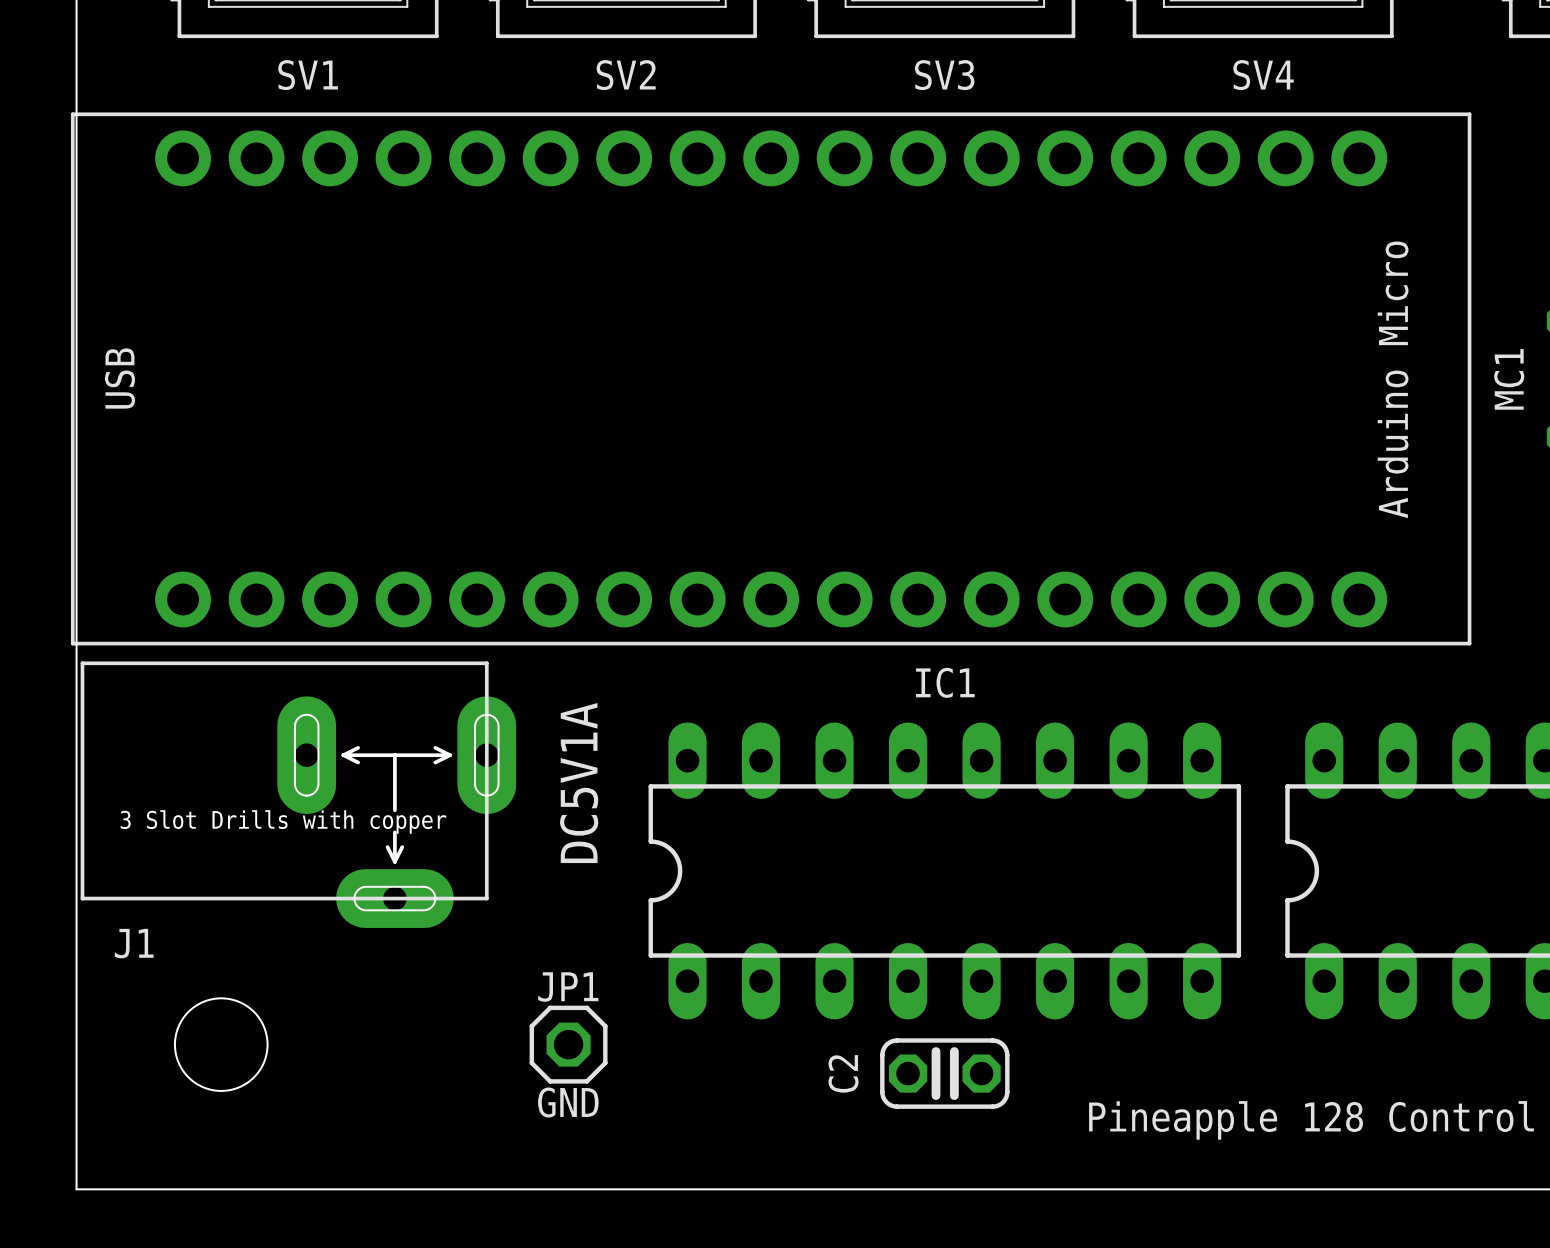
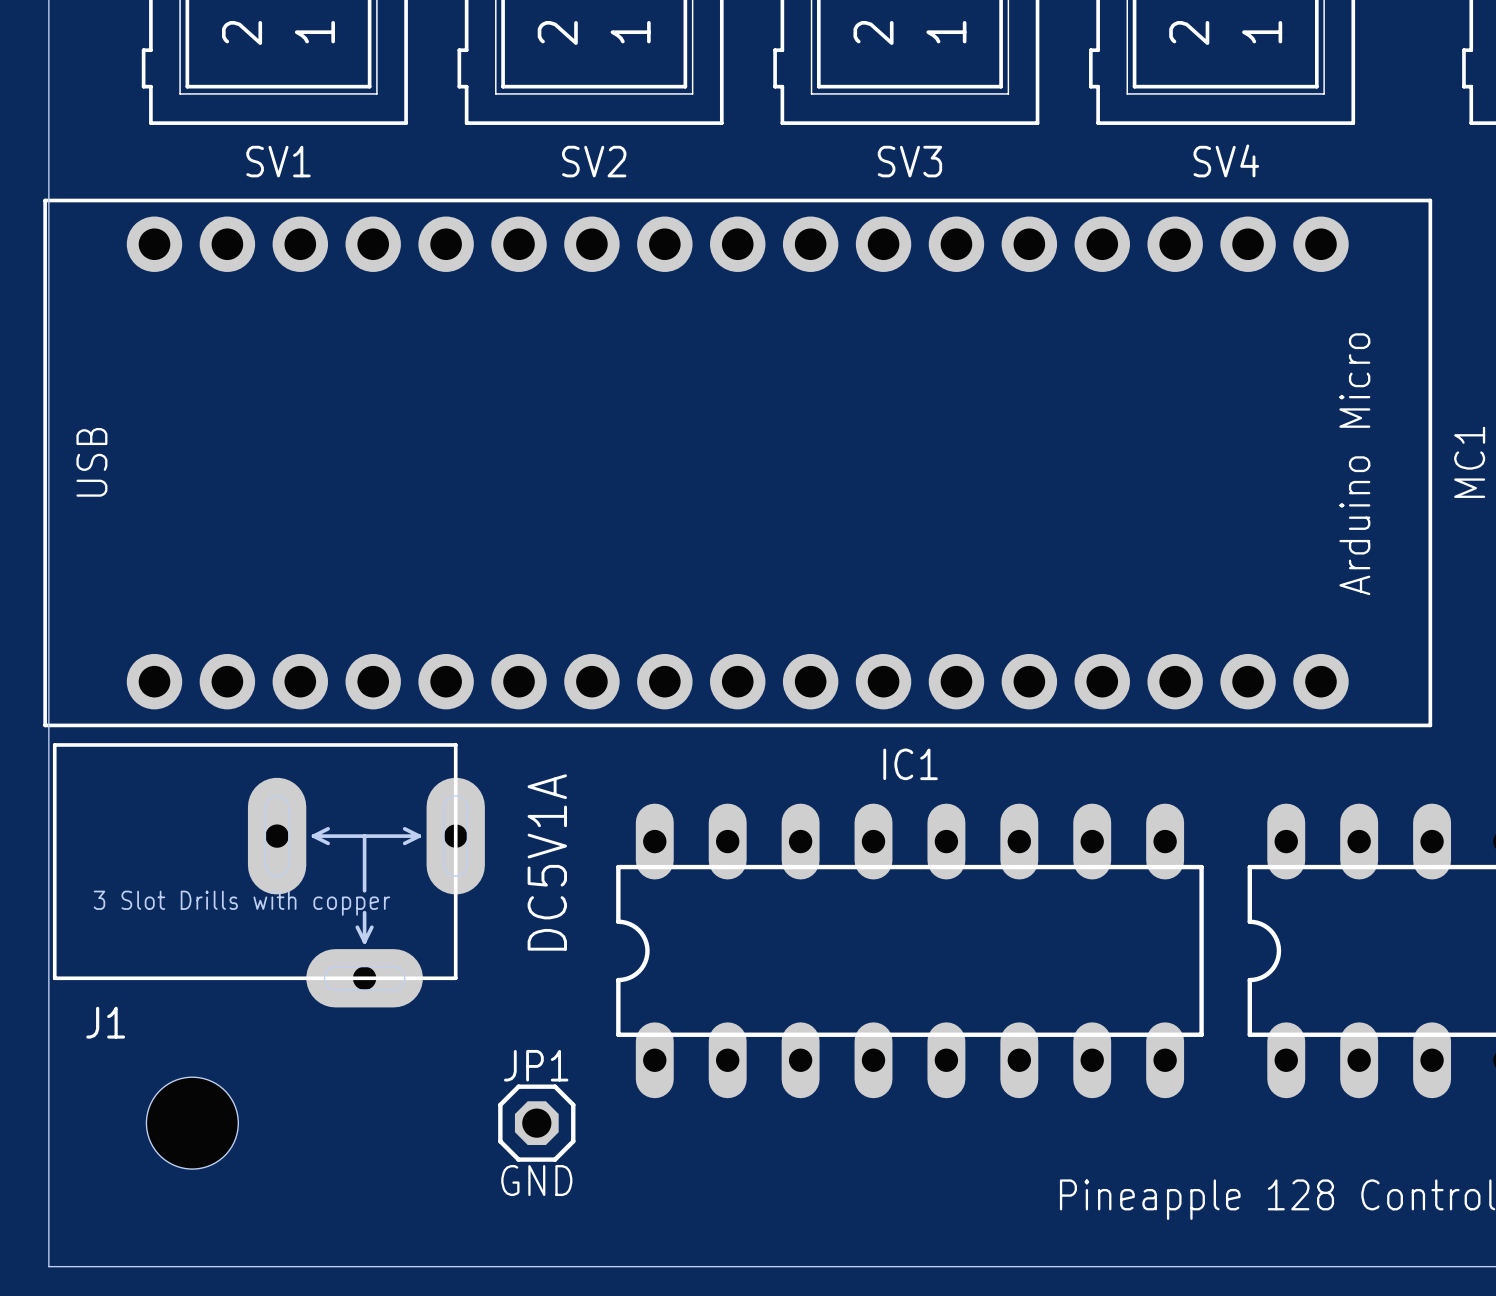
C2: (944, 1073) -> none

